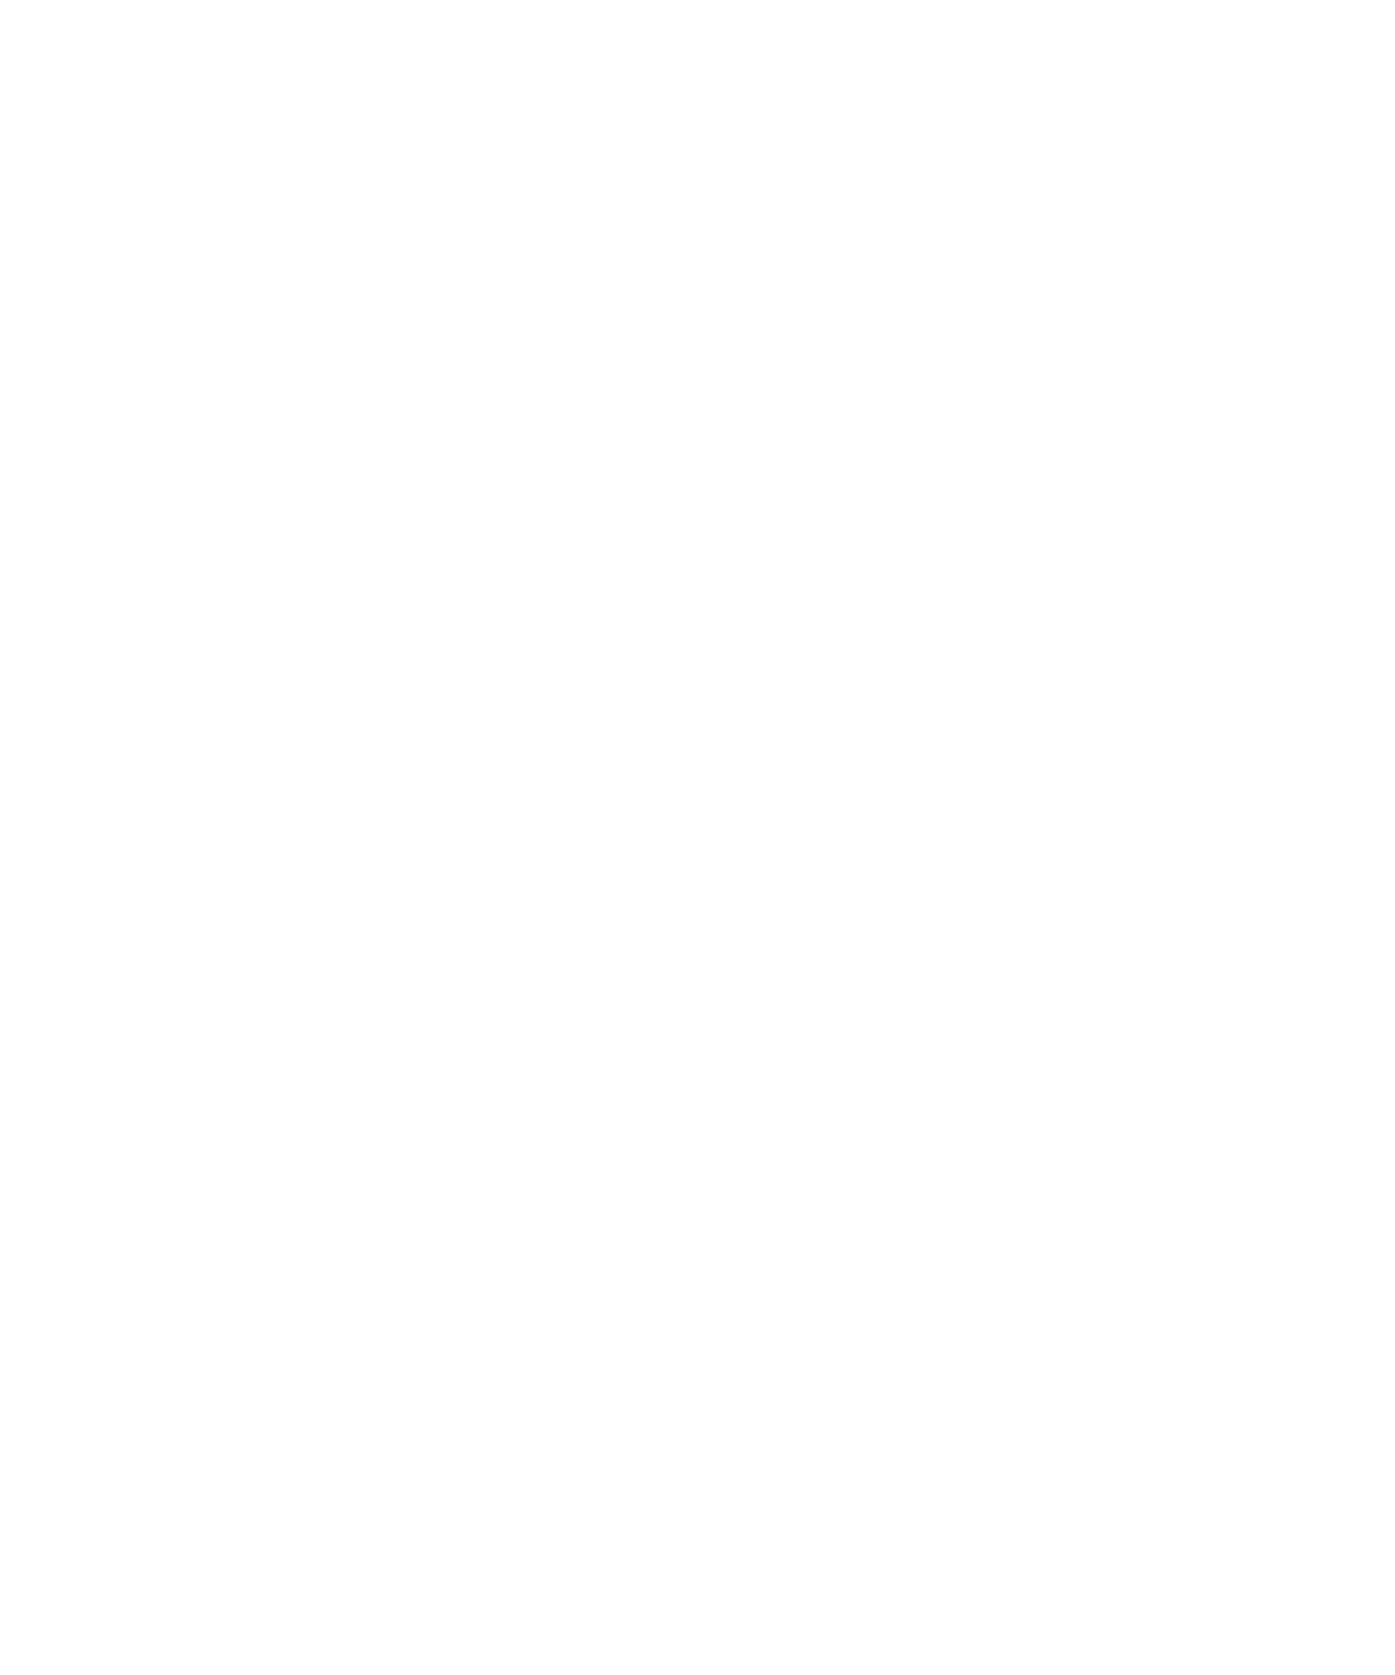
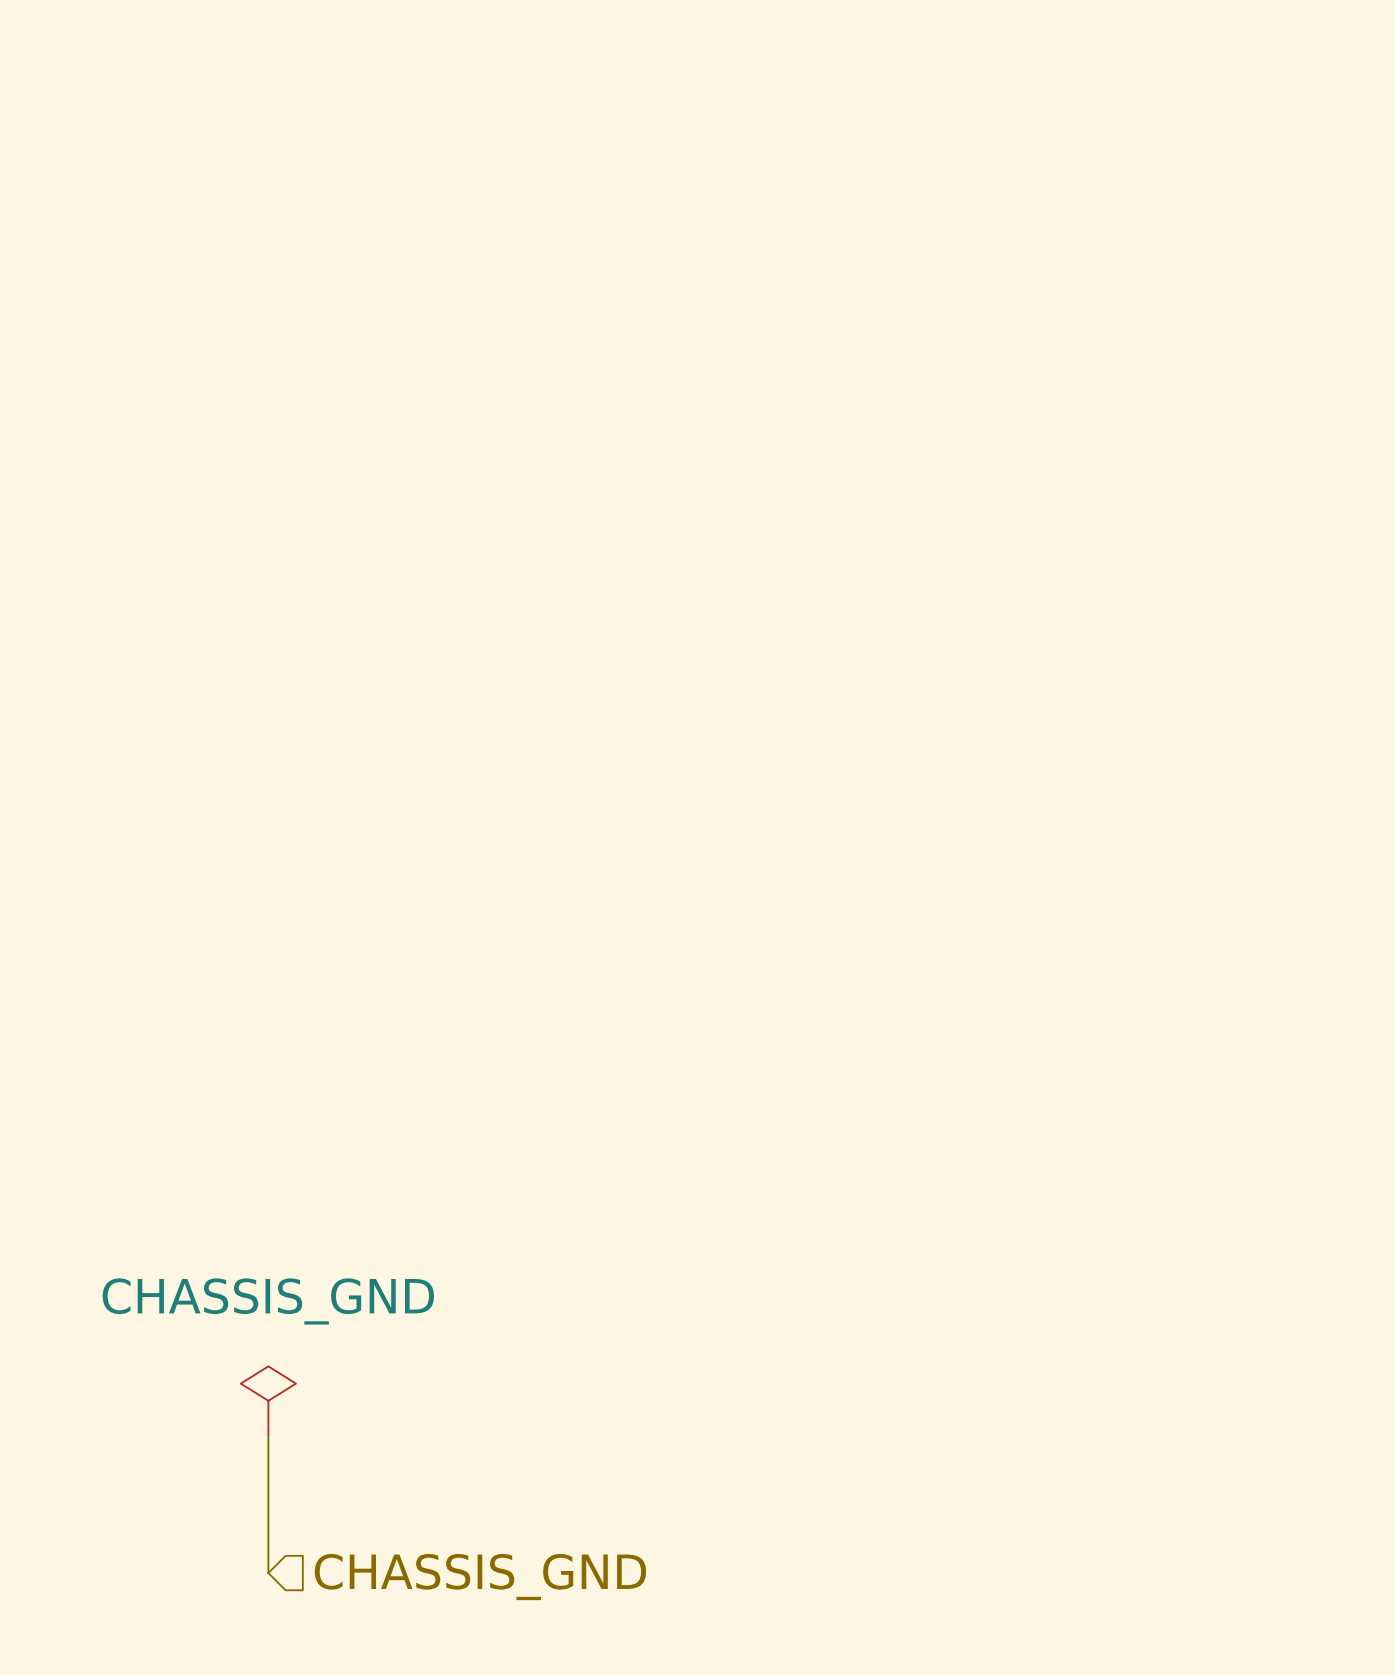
power symbol: none -> CHASSIS_GND (268, 1400)
wire: none -> (268, 1435) (268, 1573)
hierarchical label: none -> CHASSIS_GND (480, 1577)

